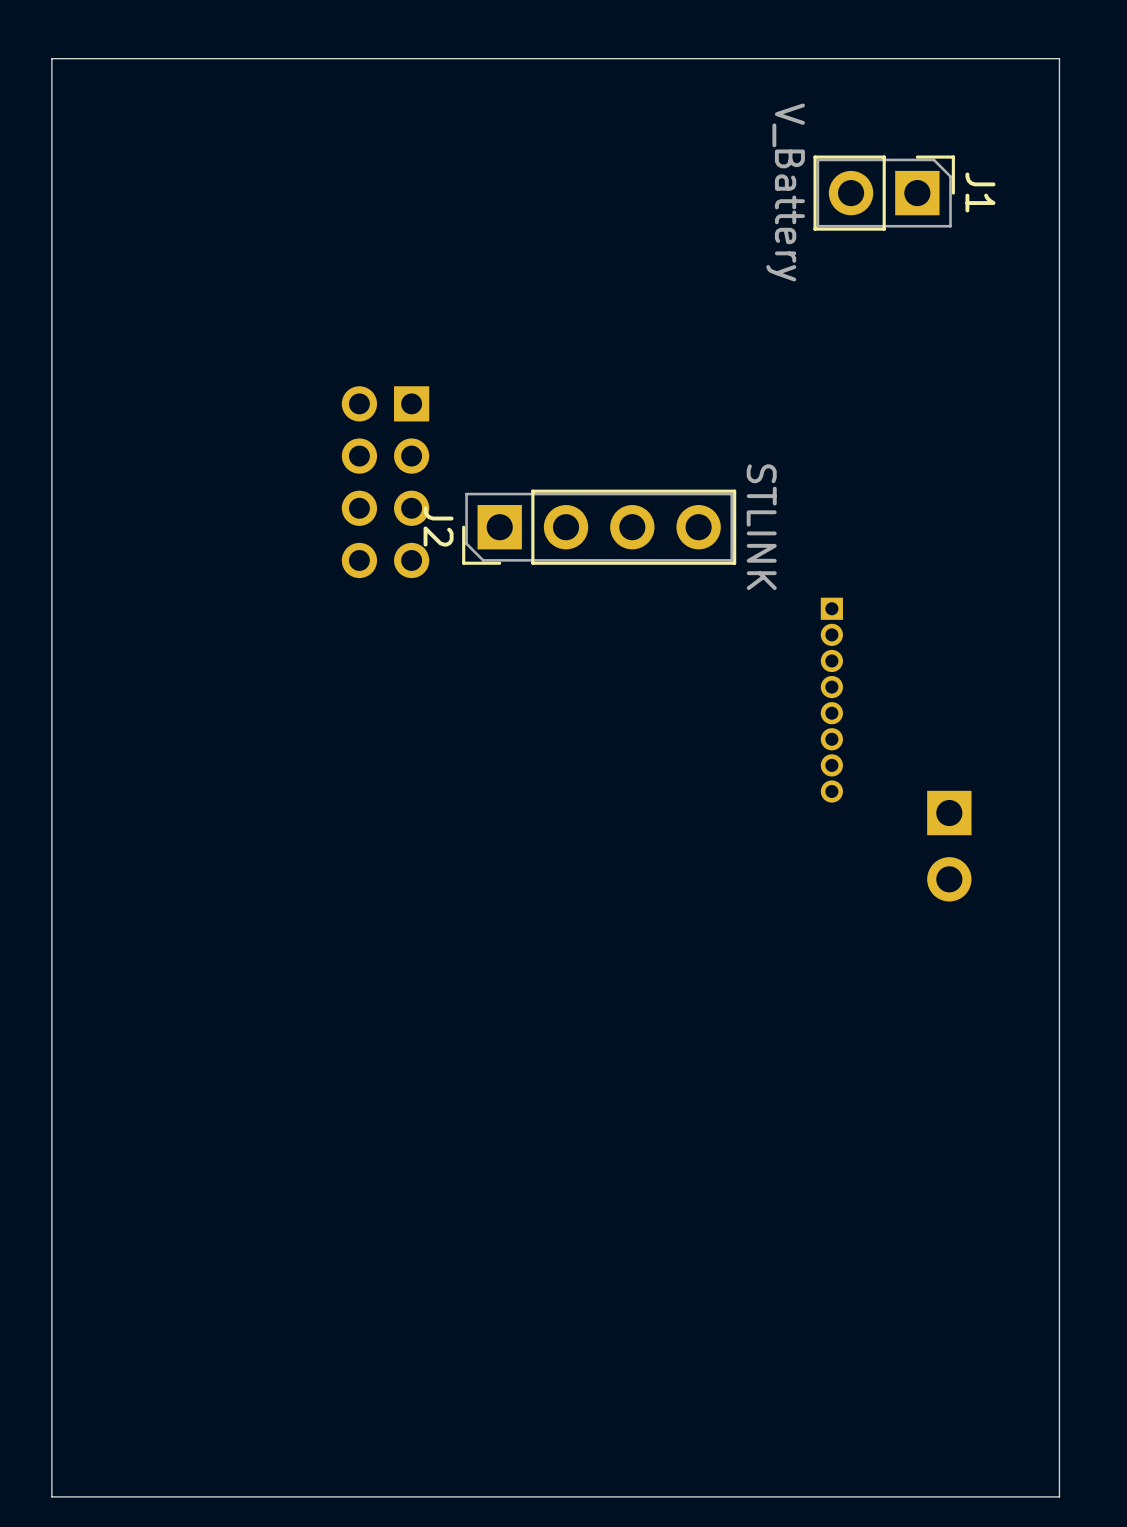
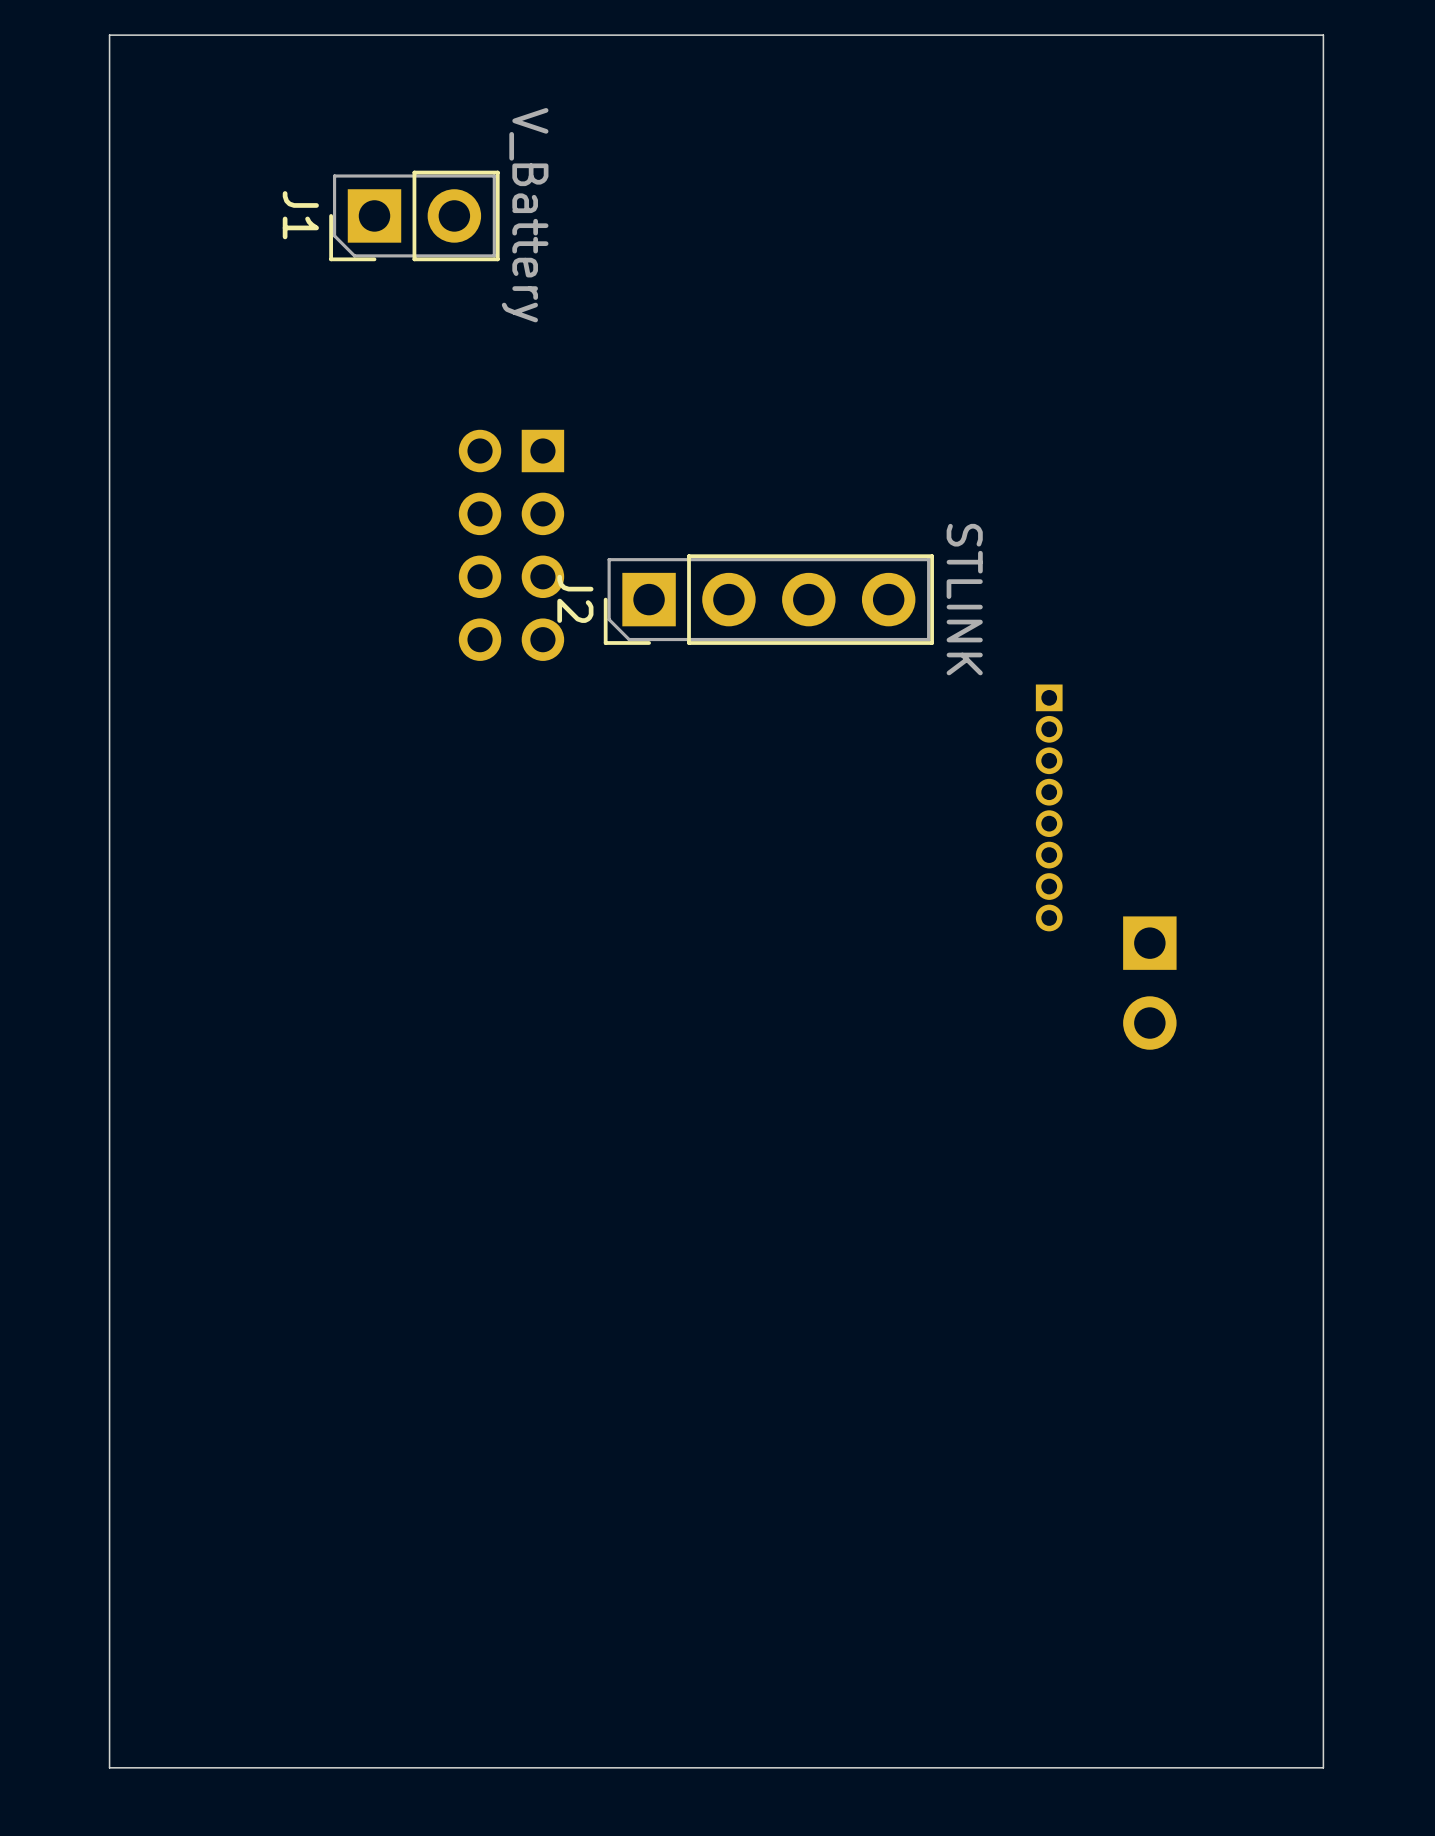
J1 rotation: 0° (884, 193) -> 180° (414, 215)
J1 position: (884, 193) -> (414, 215)
part position: (949, 846) -> (1149, 983)

